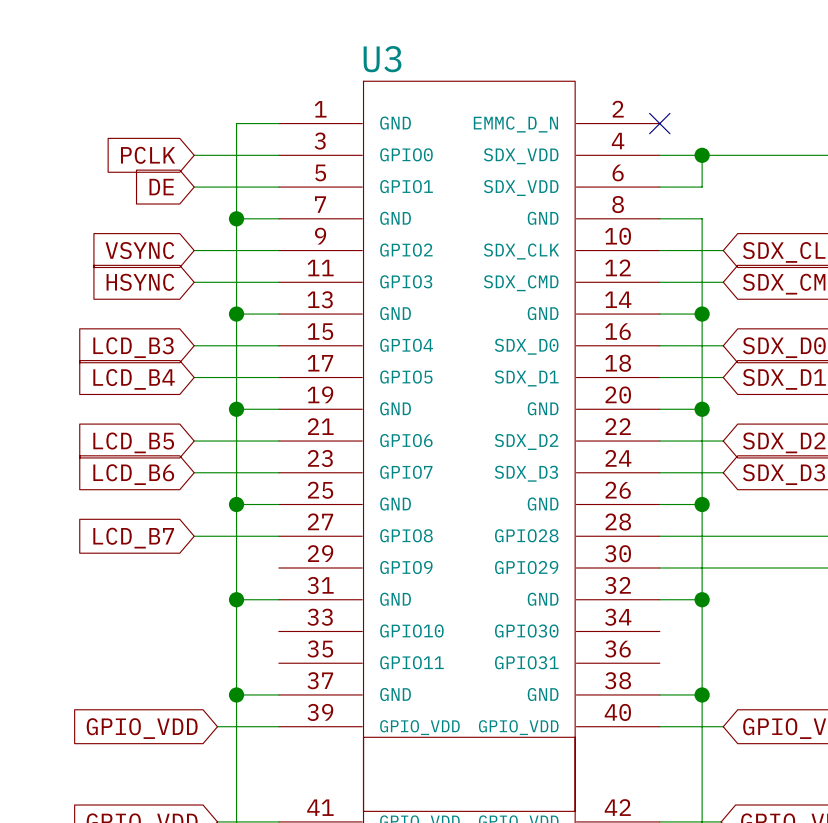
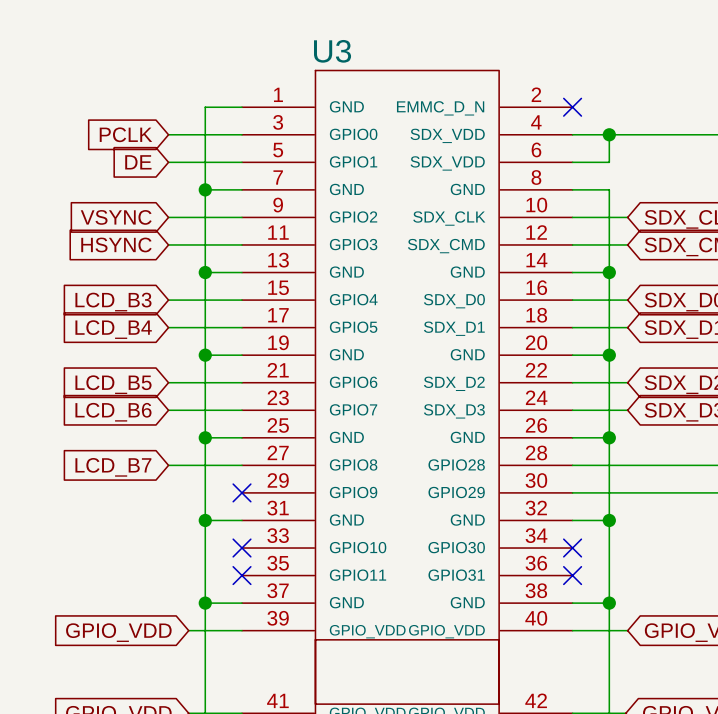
no-connect mark: none -> (242, 492)
no-connect mark: none -> (242, 548)
no-connect mark: none -> (572, 548)
no-connect mark: none -> (242, 575)
no-connect mark: none -> (572, 575)

